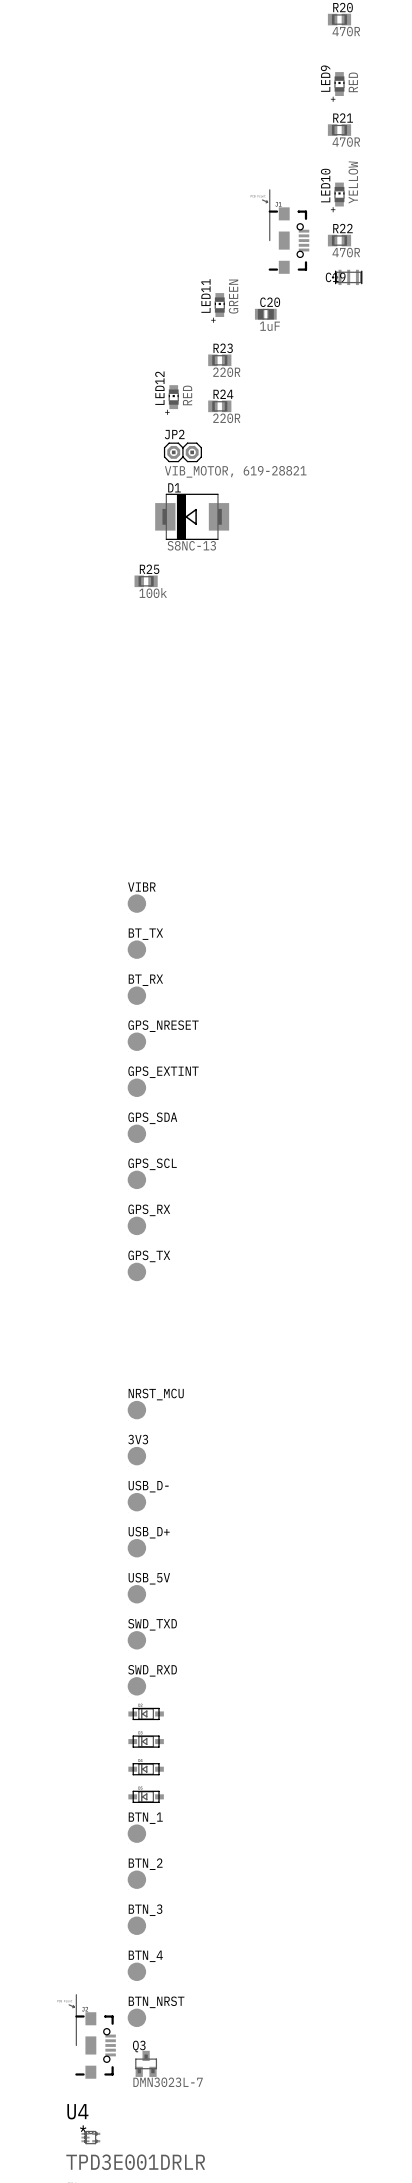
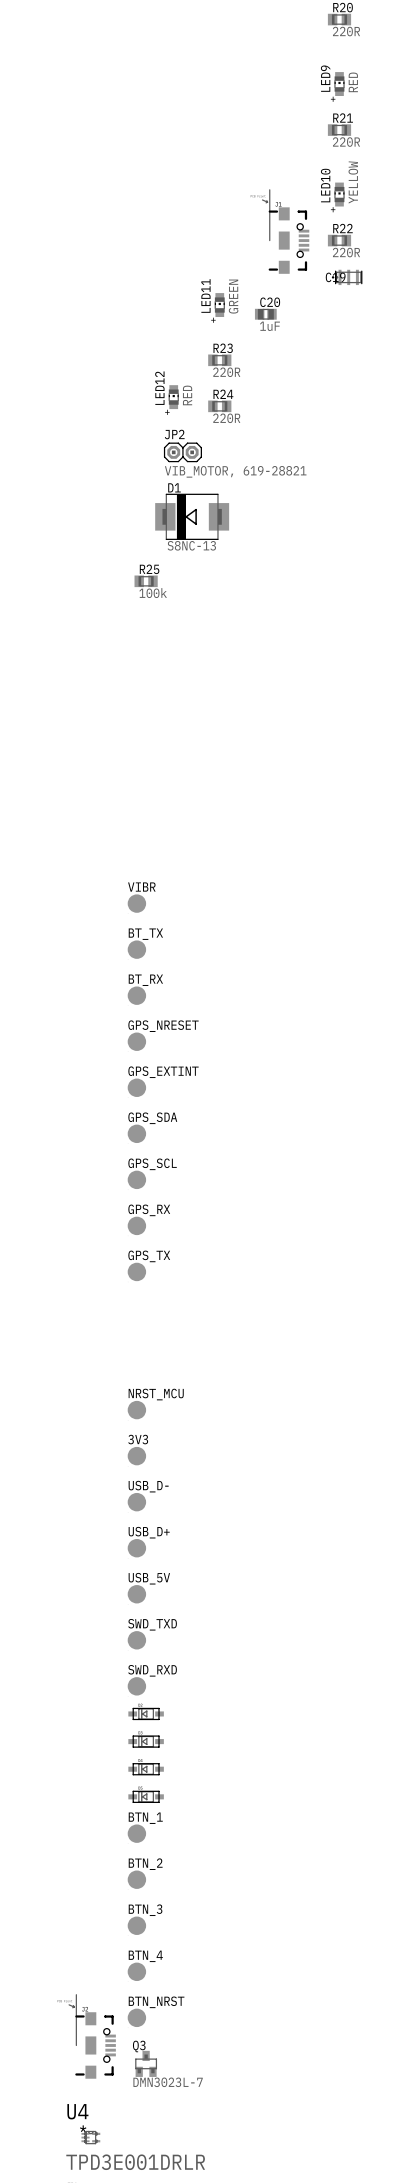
R20 value: 470R (346, 31) -> 220R (346, 31)
R21 value: 470R (346, 142) -> 220R (346, 142)
R22 value: 470R (346, 252) -> 220R (346, 252)

